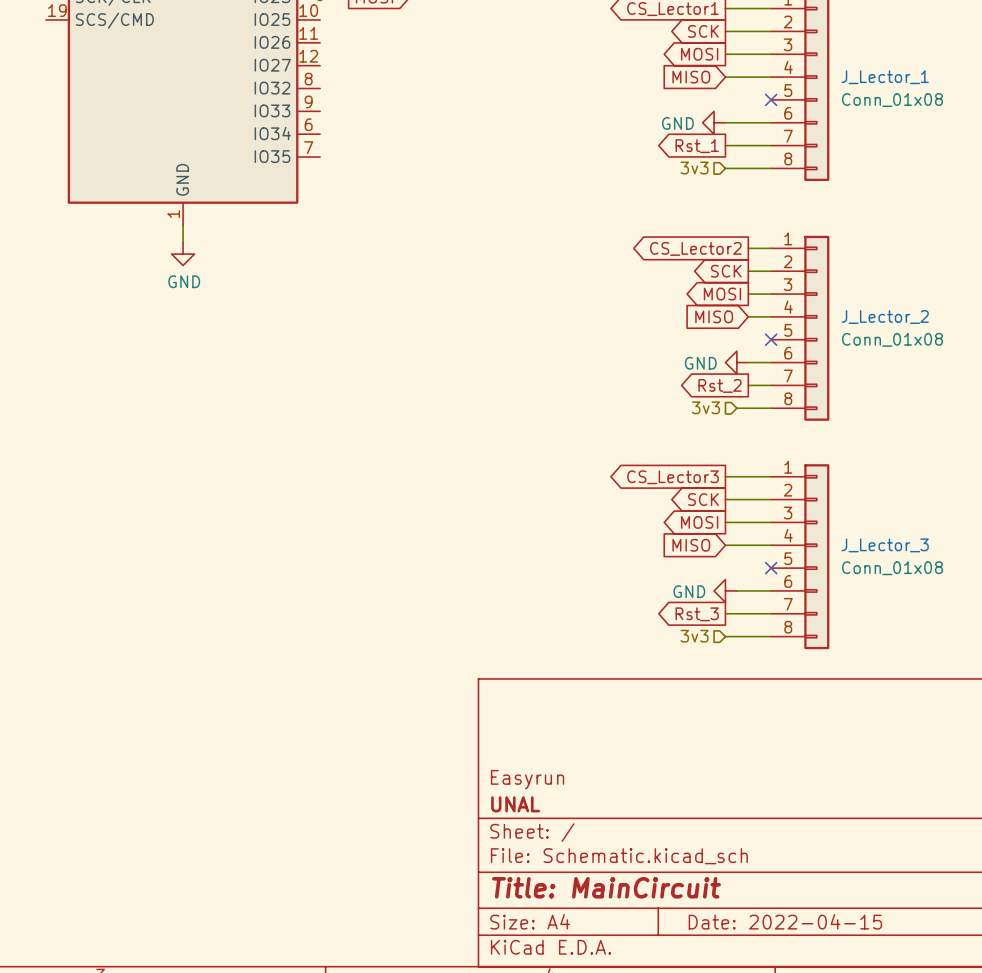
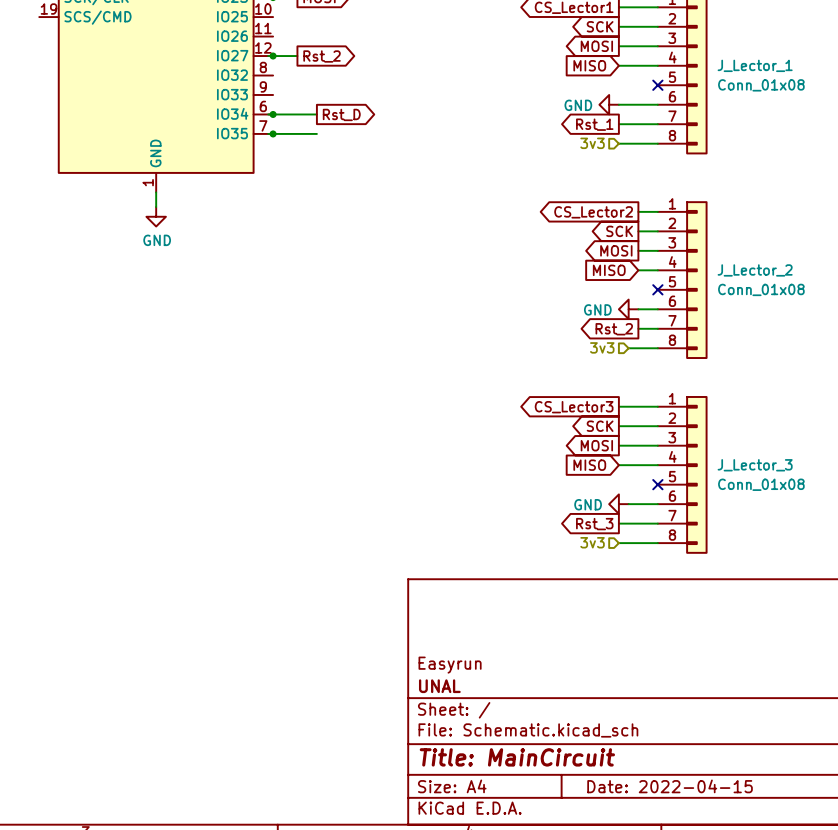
wire: none -> (268, 56) (297, 56)
junction: none -> (273, 56)
global label: none -> Rst_2 (322, 56)
wire: none -> (268, 114) (316, 114)
junction: none -> (273, 114)
global label: none -> Rst_D (341, 114)
wire: none -> (268, 133) (316, 133)
junction: none -> (273, 133)

